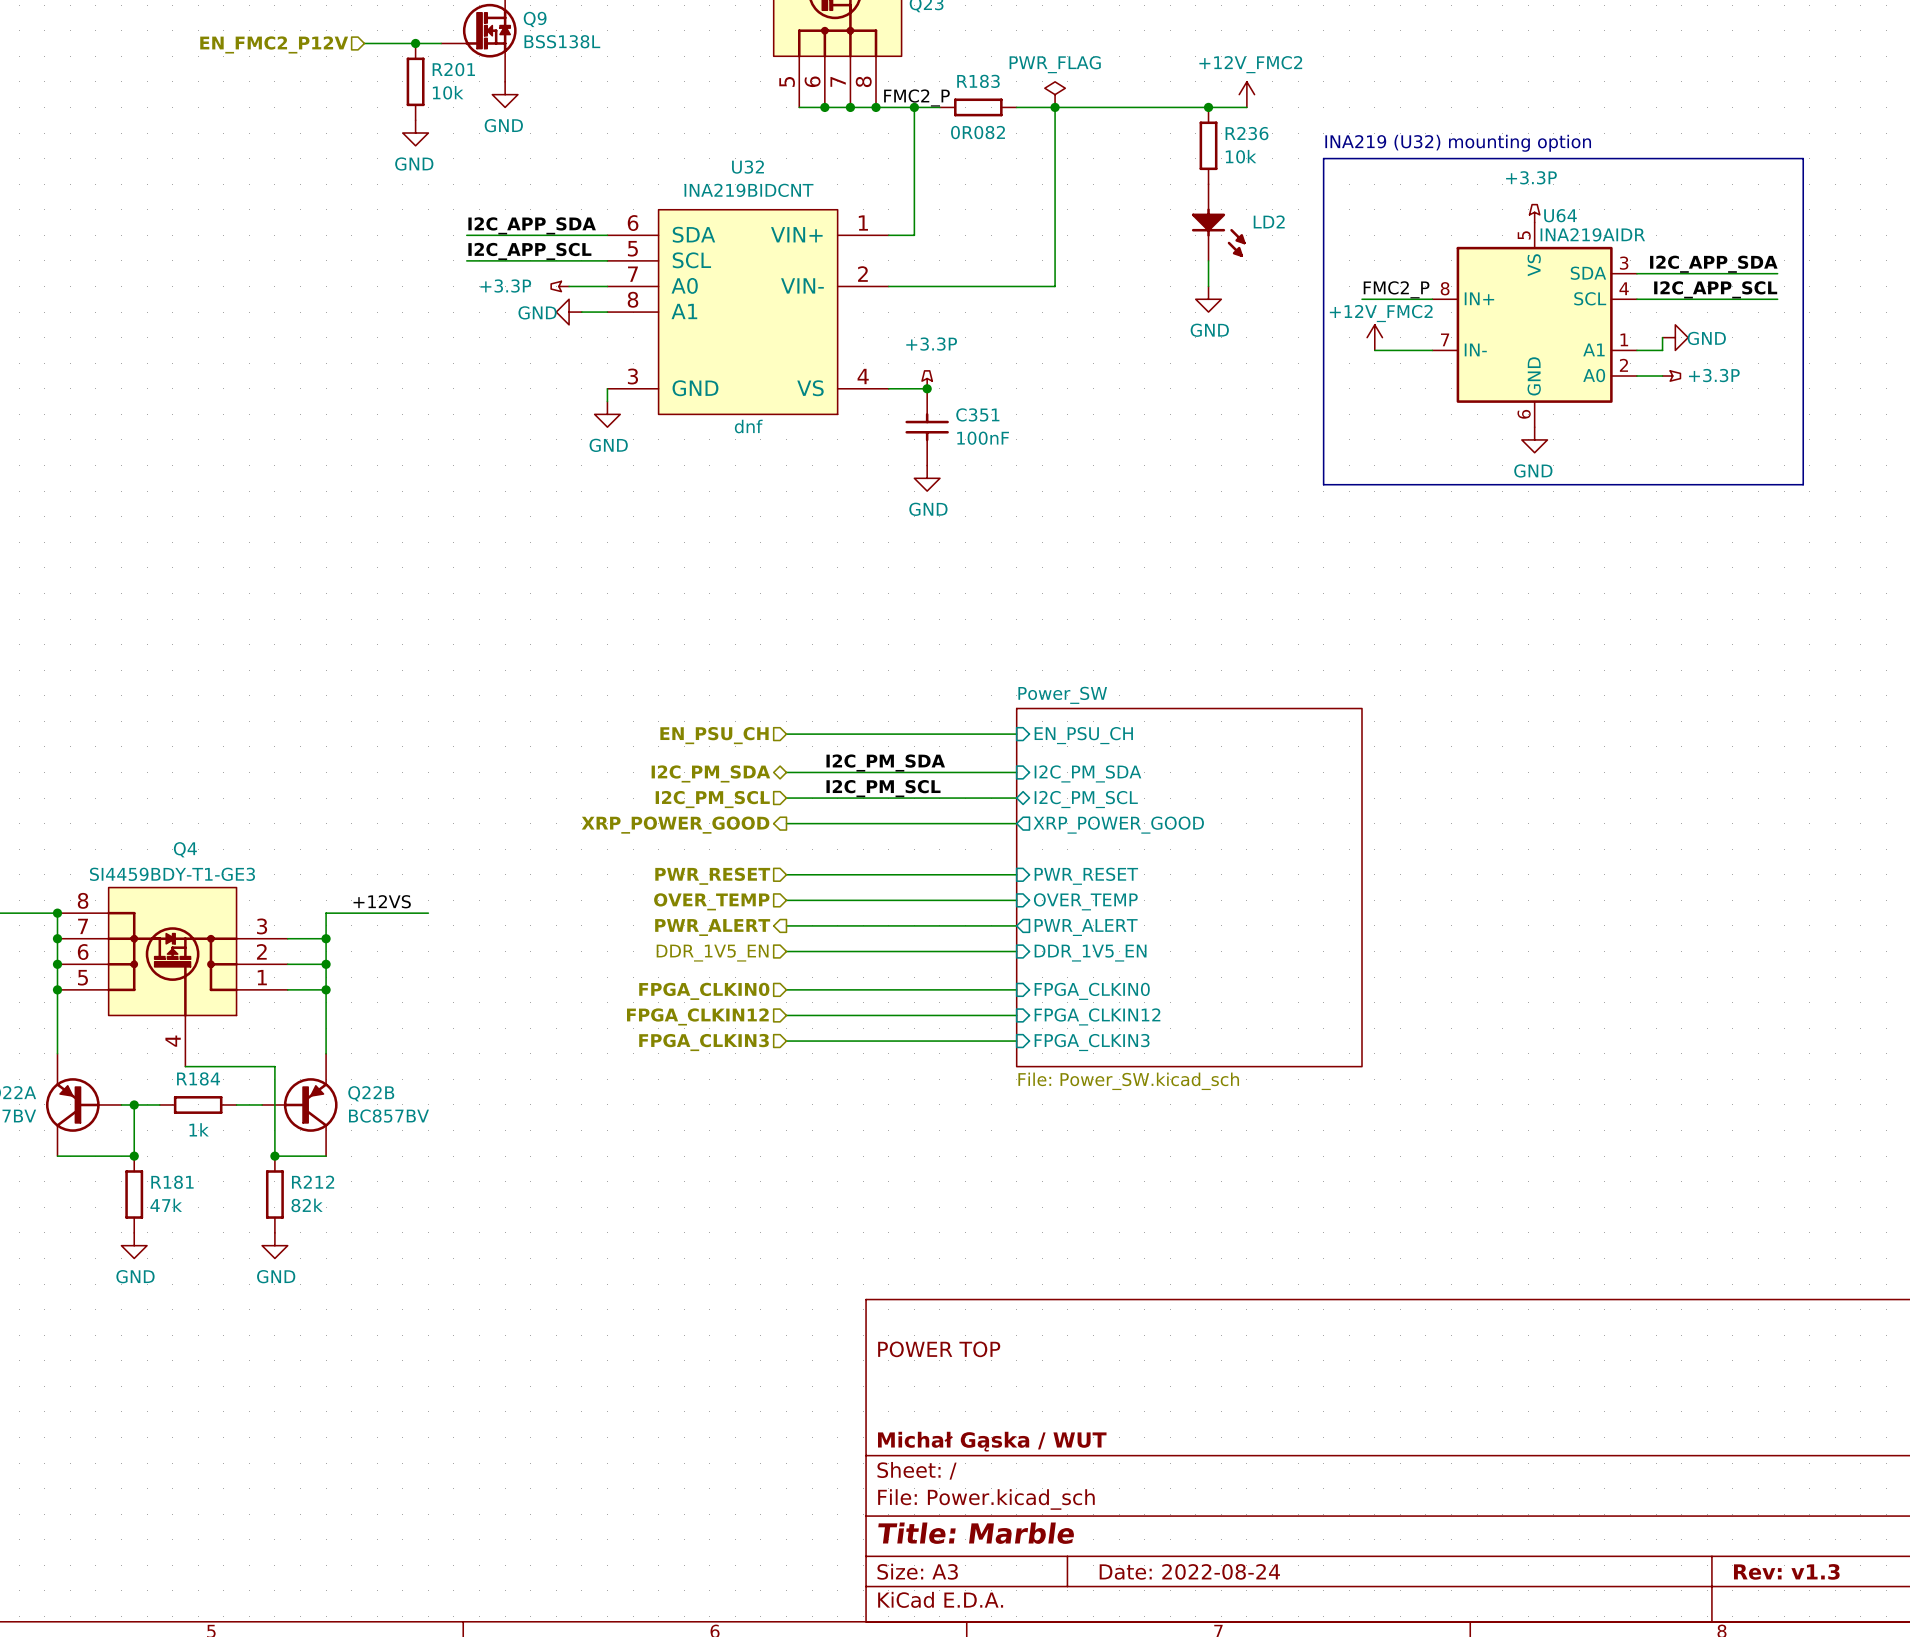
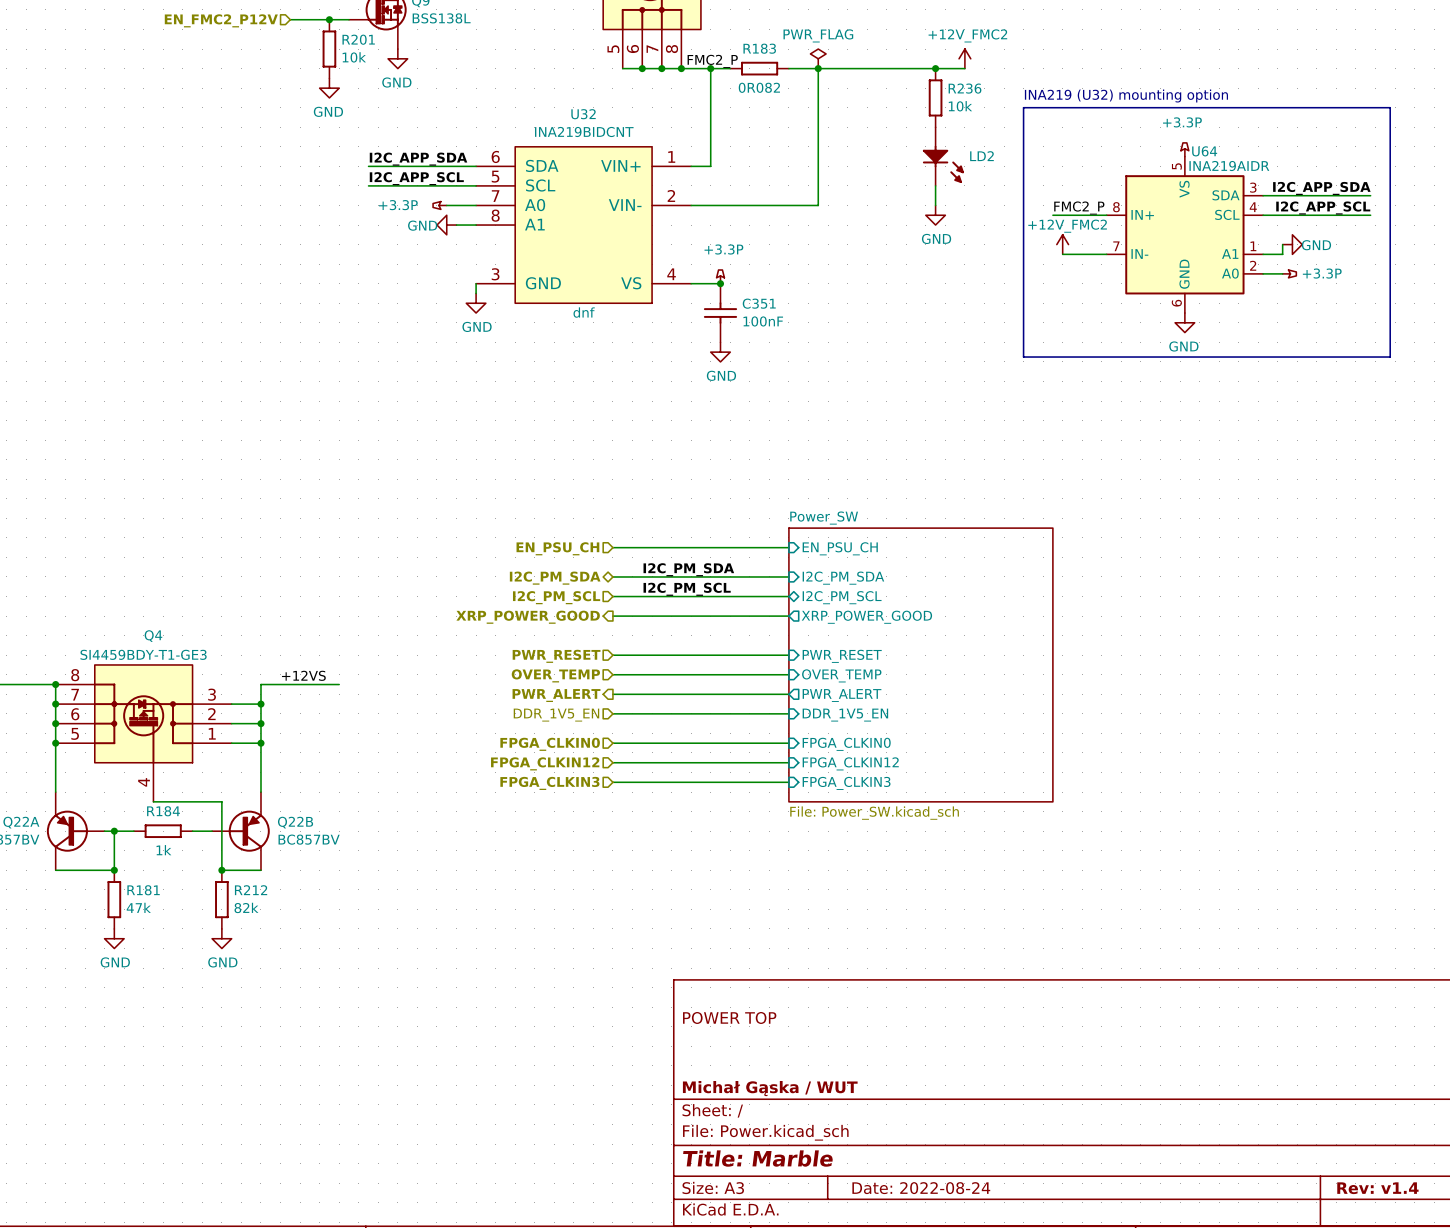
title block: Rev: v1.3 (1786, 1571) -> Rev: v1.4 (1377, 1188)

